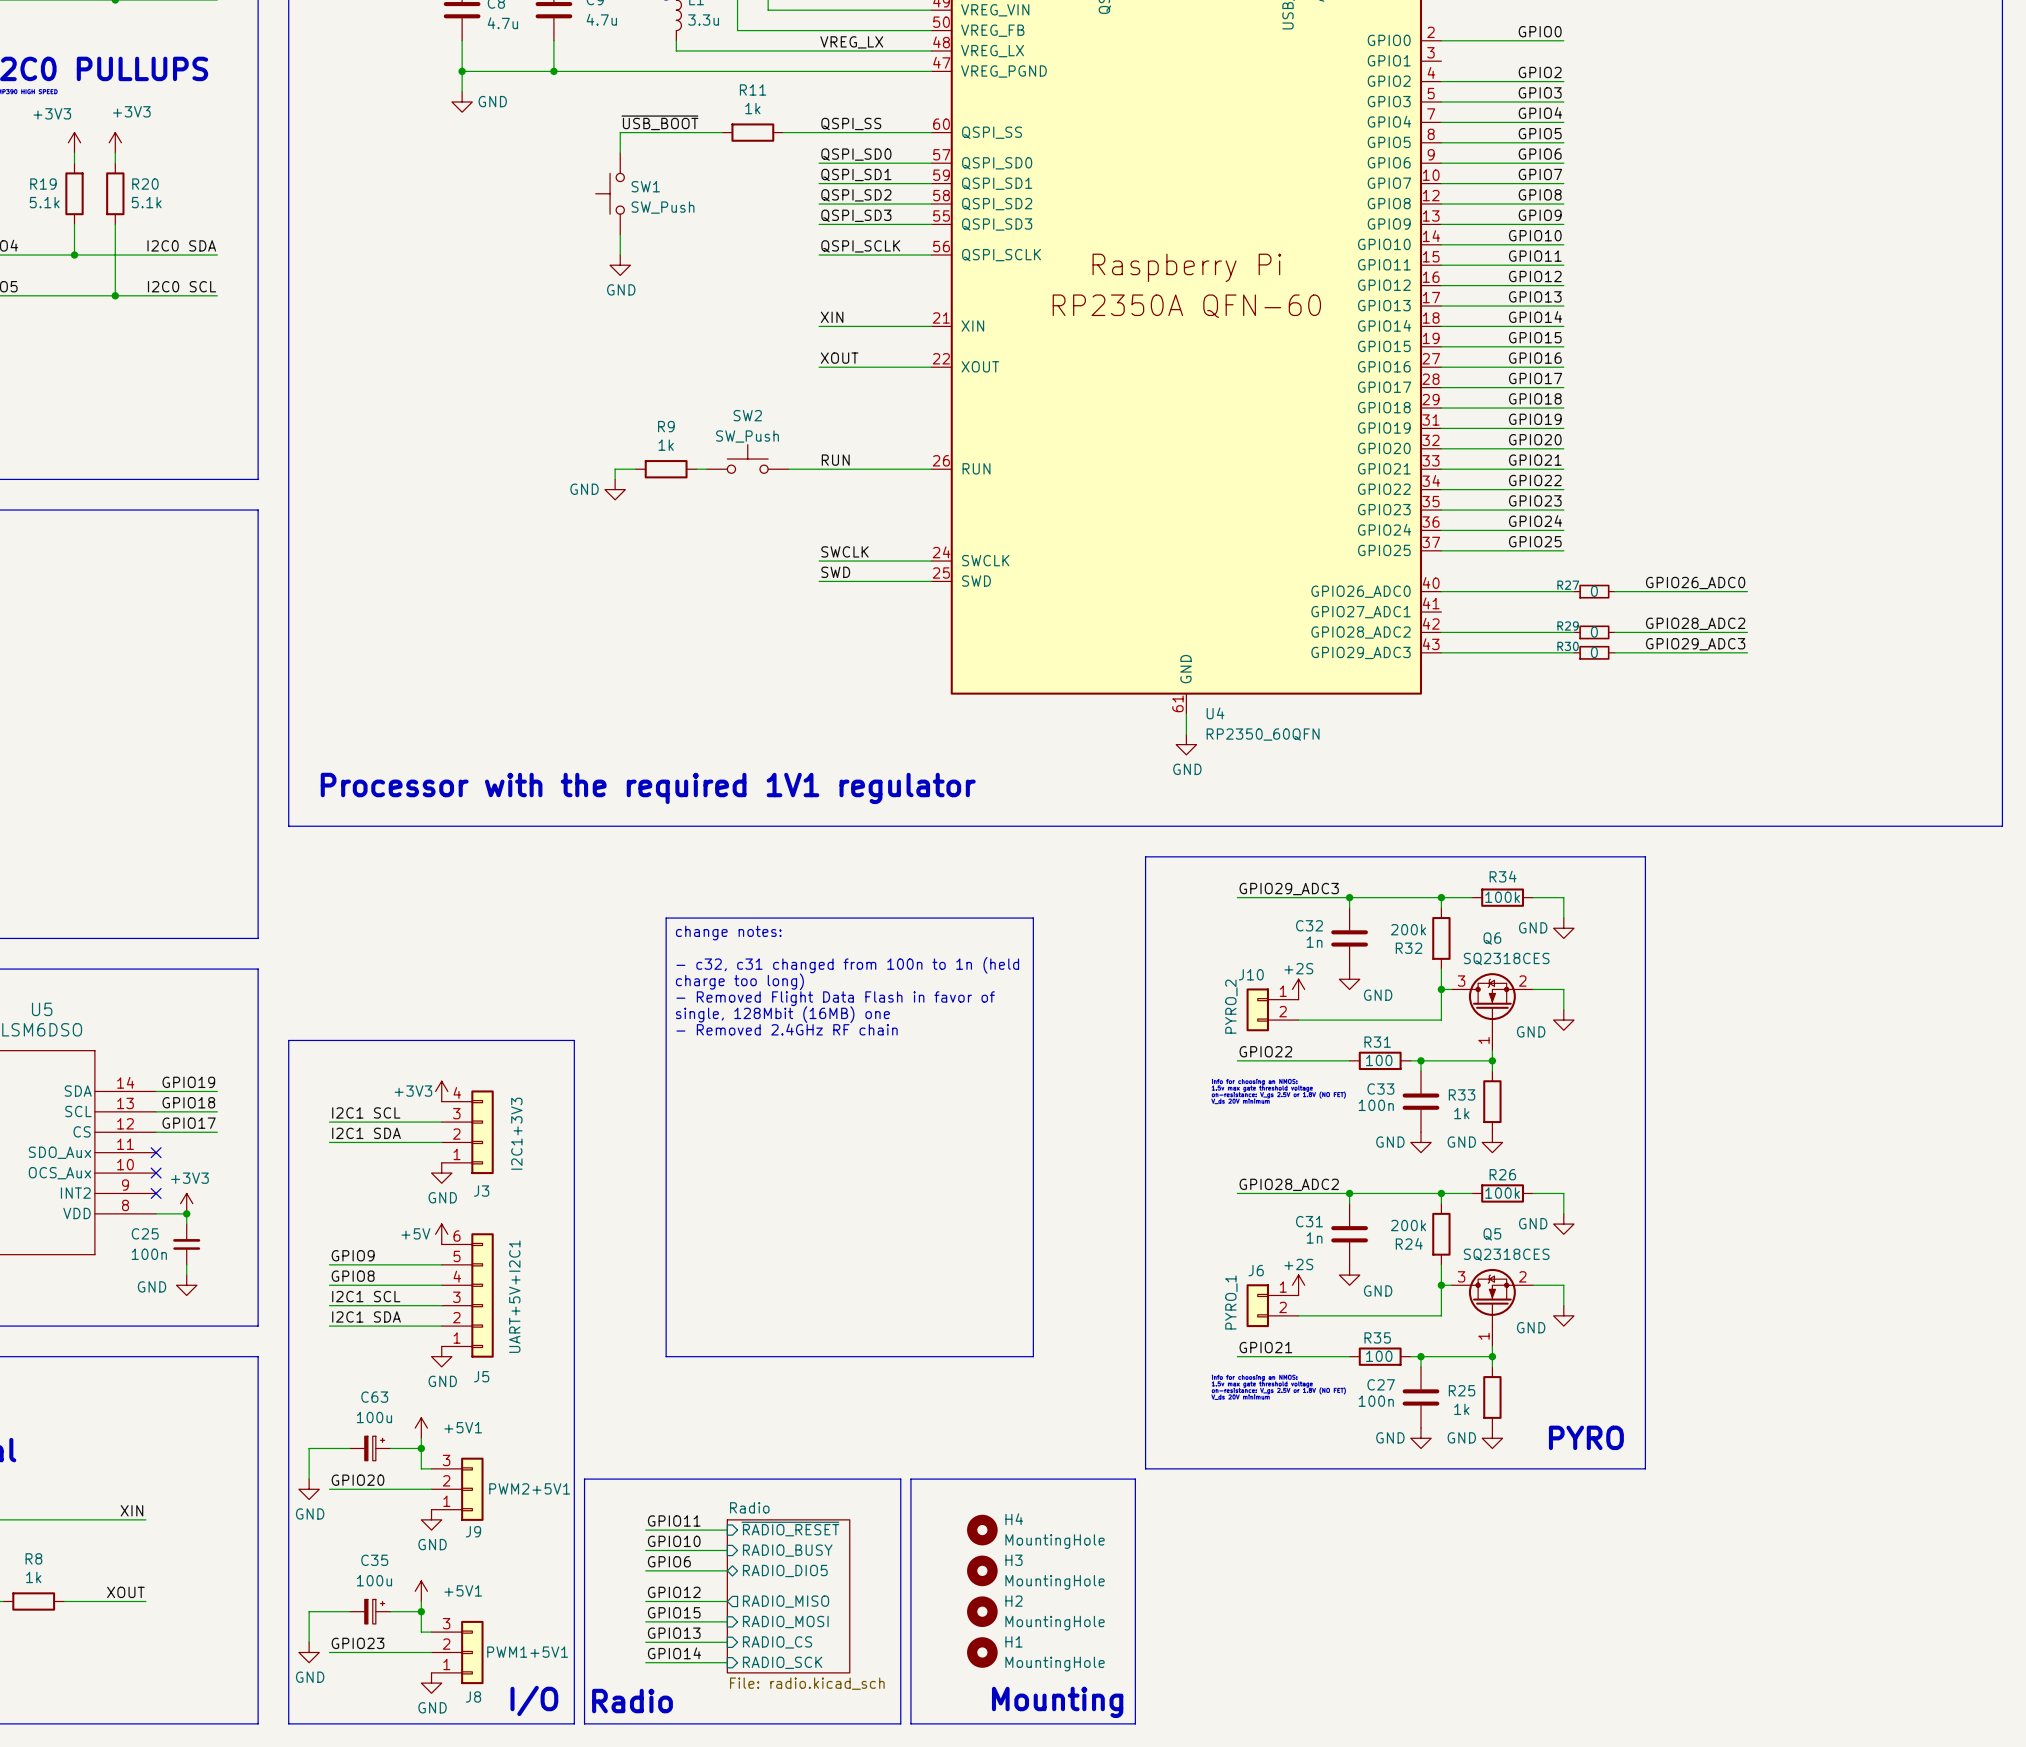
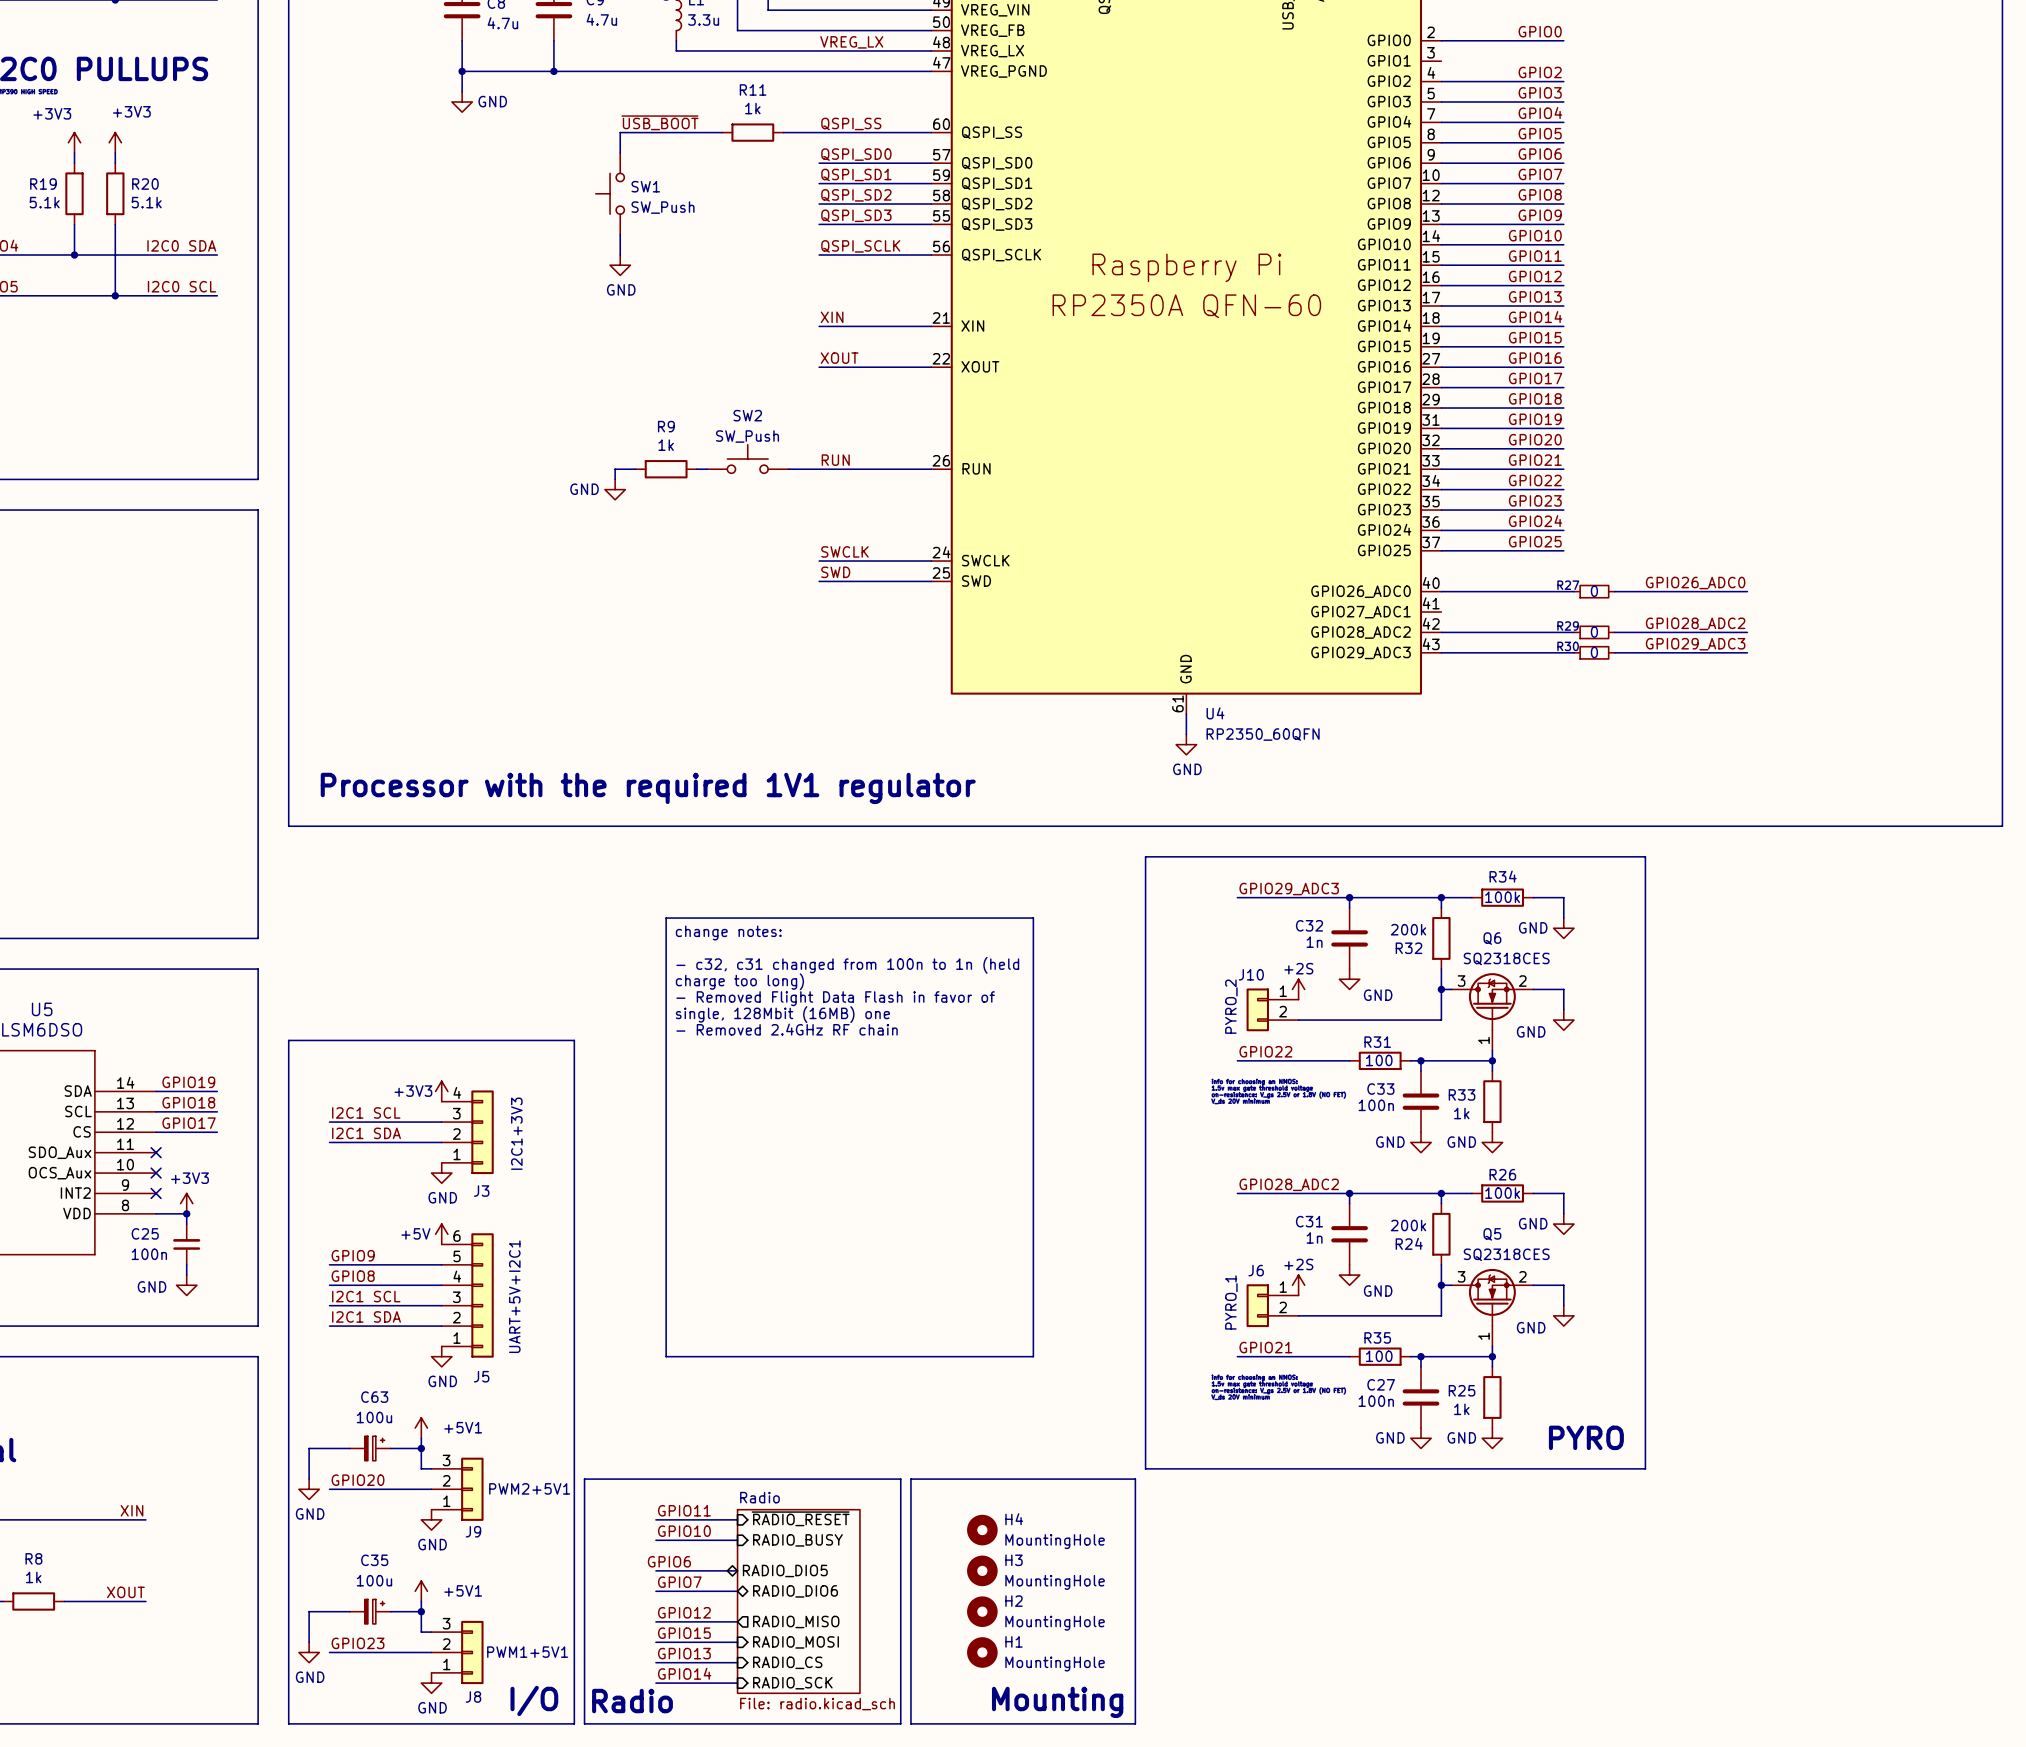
label position: GPIO11 (674, 1520) -> GPIO11 (684, 1510)
sheet pin position: ~{RADIO_RESET} (790, 1529) -> ~{RADIO_RESET} (800, 1518)
wire: (645, 1530) (727, 1530) -> (655, 1519) (737, 1519)
label position: GPIO10 (674, 1541) -> GPIO10 (684, 1531)
wire: (645, 1550) (727, 1550) -> (655, 1540) (737, 1540)
sheet pin position: RADIO_BUSY (787, 1550) -> RADIO_BUSY (797, 1540)
wire: (645, 1570) (655, 1570) -> (727, 1570) (737, 1570)
label: none -> GPIO7 (679, 1582)
sheet pin: none -> RADIO_DIO6 (795, 1591)
label position: GPIO12 (674, 1592) -> GPIO12 (684, 1612)
sheet Radio: File: radio.kicad_sch (788, 1596) -> none
wire: (645, 1601) (727, 1601) -> (655, 1591) (737, 1591)
sheet pin position: RADIO_MISO (786, 1601) -> RADIO_MISO (796, 1621)
sheet Radio: none -> File: radio.kicad_sch (798, 1601)
label position: GPIO15 (674, 1612) -> GPIO15 (684, 1633)
wire: (645, 1621) (655, 1621) -> (727, 1621) (737, 1621)
sheet pin position: RADIO_MOSI (785, 1621) -> RADIO_MOSI (795, 1642)
label position: GPIO13 (674, 1633) -> GPIO13 (684, 1653)
wire: (645, 1642) (655, 1642) -> (727, 1642) (737, 1642)
sheet pin position: RADIO_CS (777, 1642) -> RADIO_CS (787, 1662)
label position: GPIO14 (674, 1653) -> GPIO14 (684, 1673)
wire: (645, 1662) (655, 1662) -> (727, 1662) (737, 1662)
sheet pin position: RADIO_SCK (782, 1662) -> RADIO_SCK (792, 1683)
wire: none -> (655, 1683) (737, 1683)

